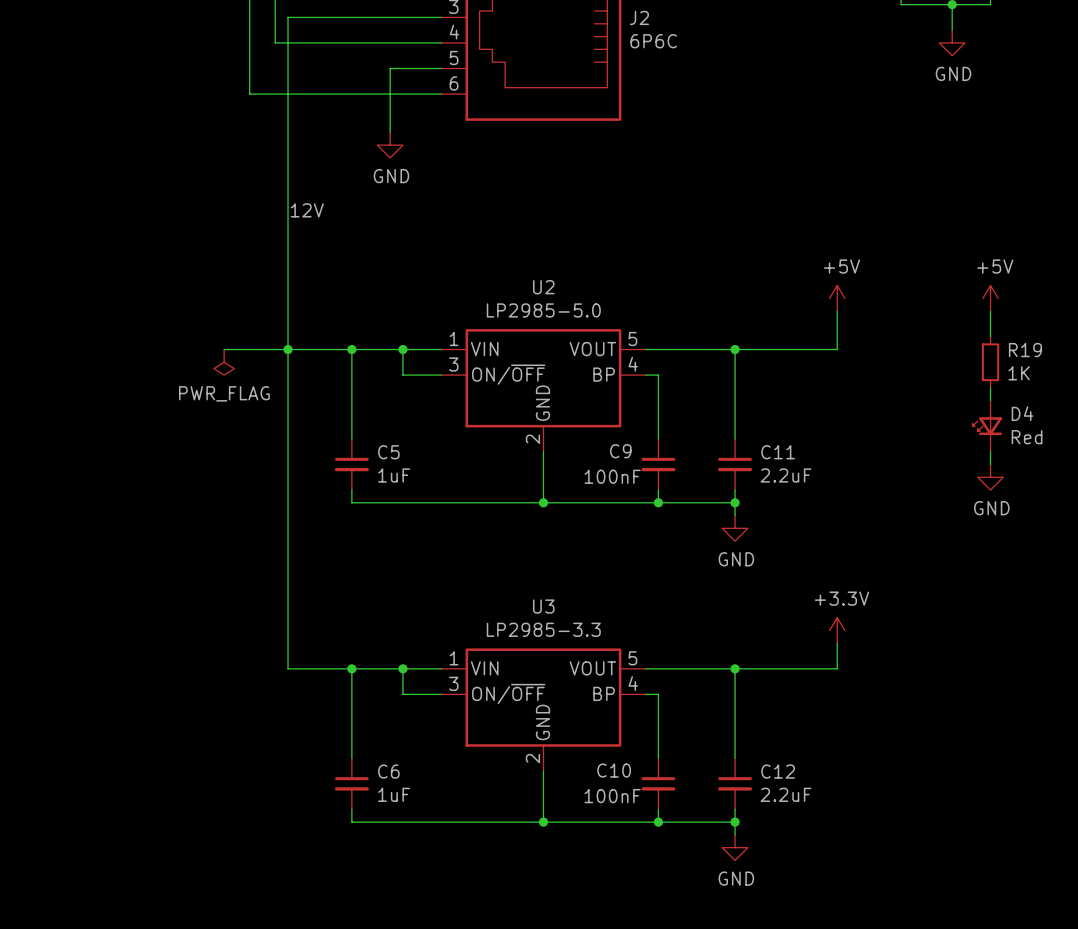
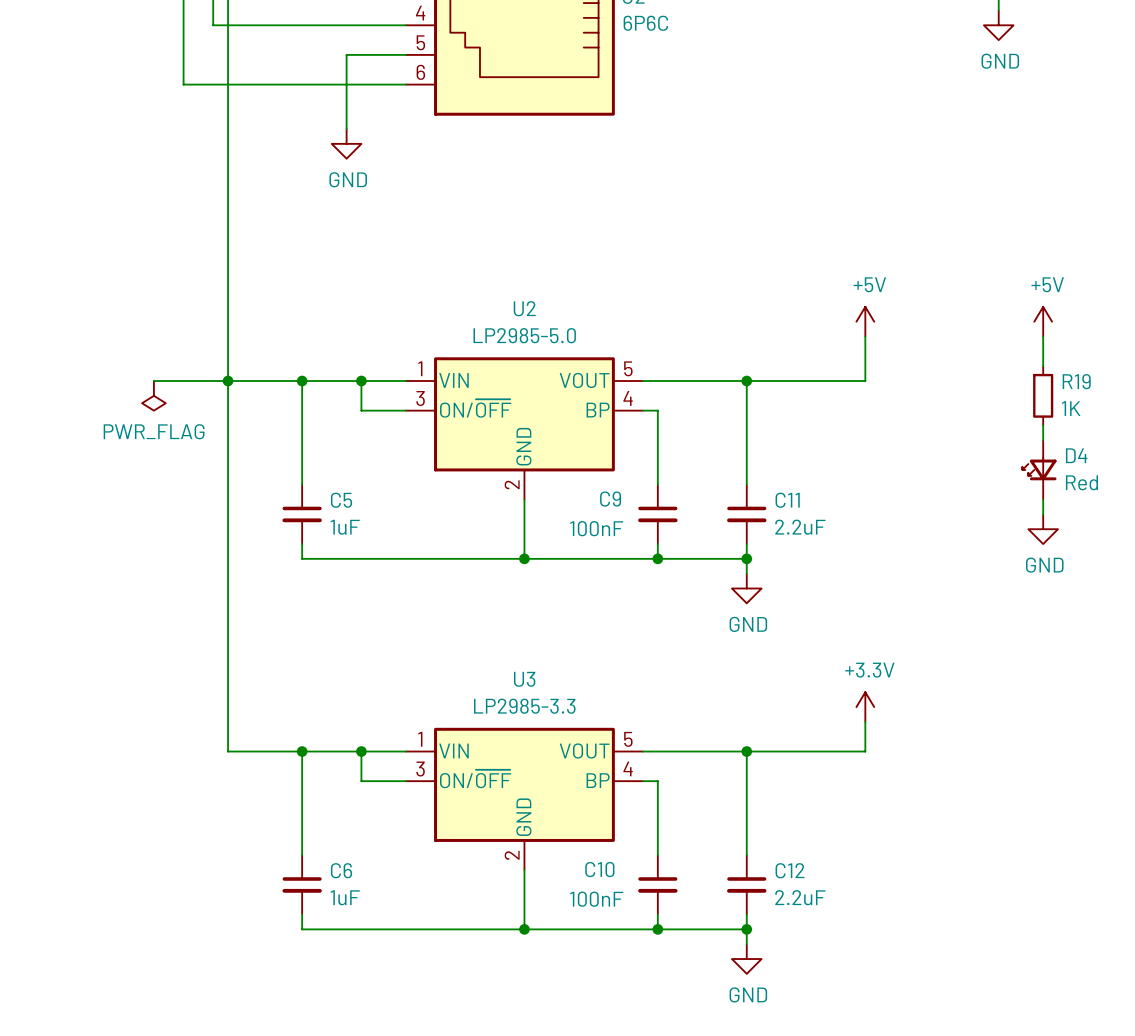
label: 12V (307, 210) -> none

